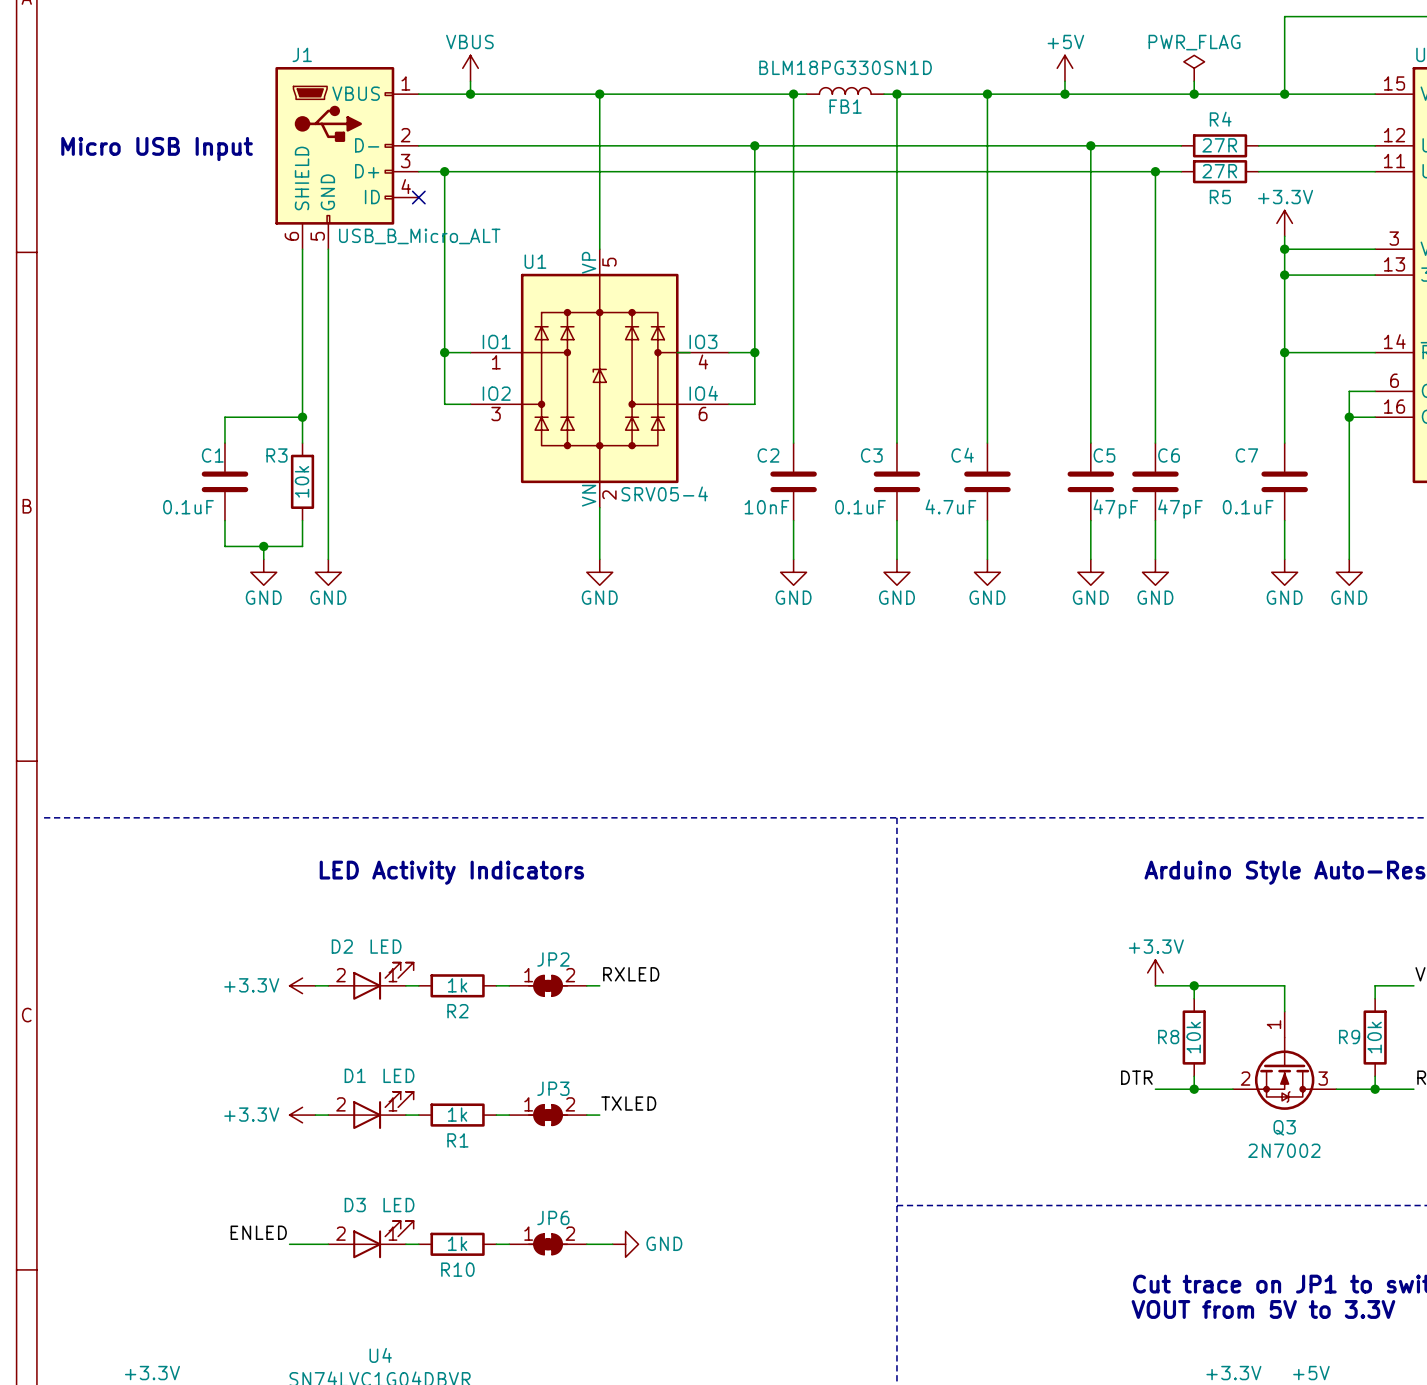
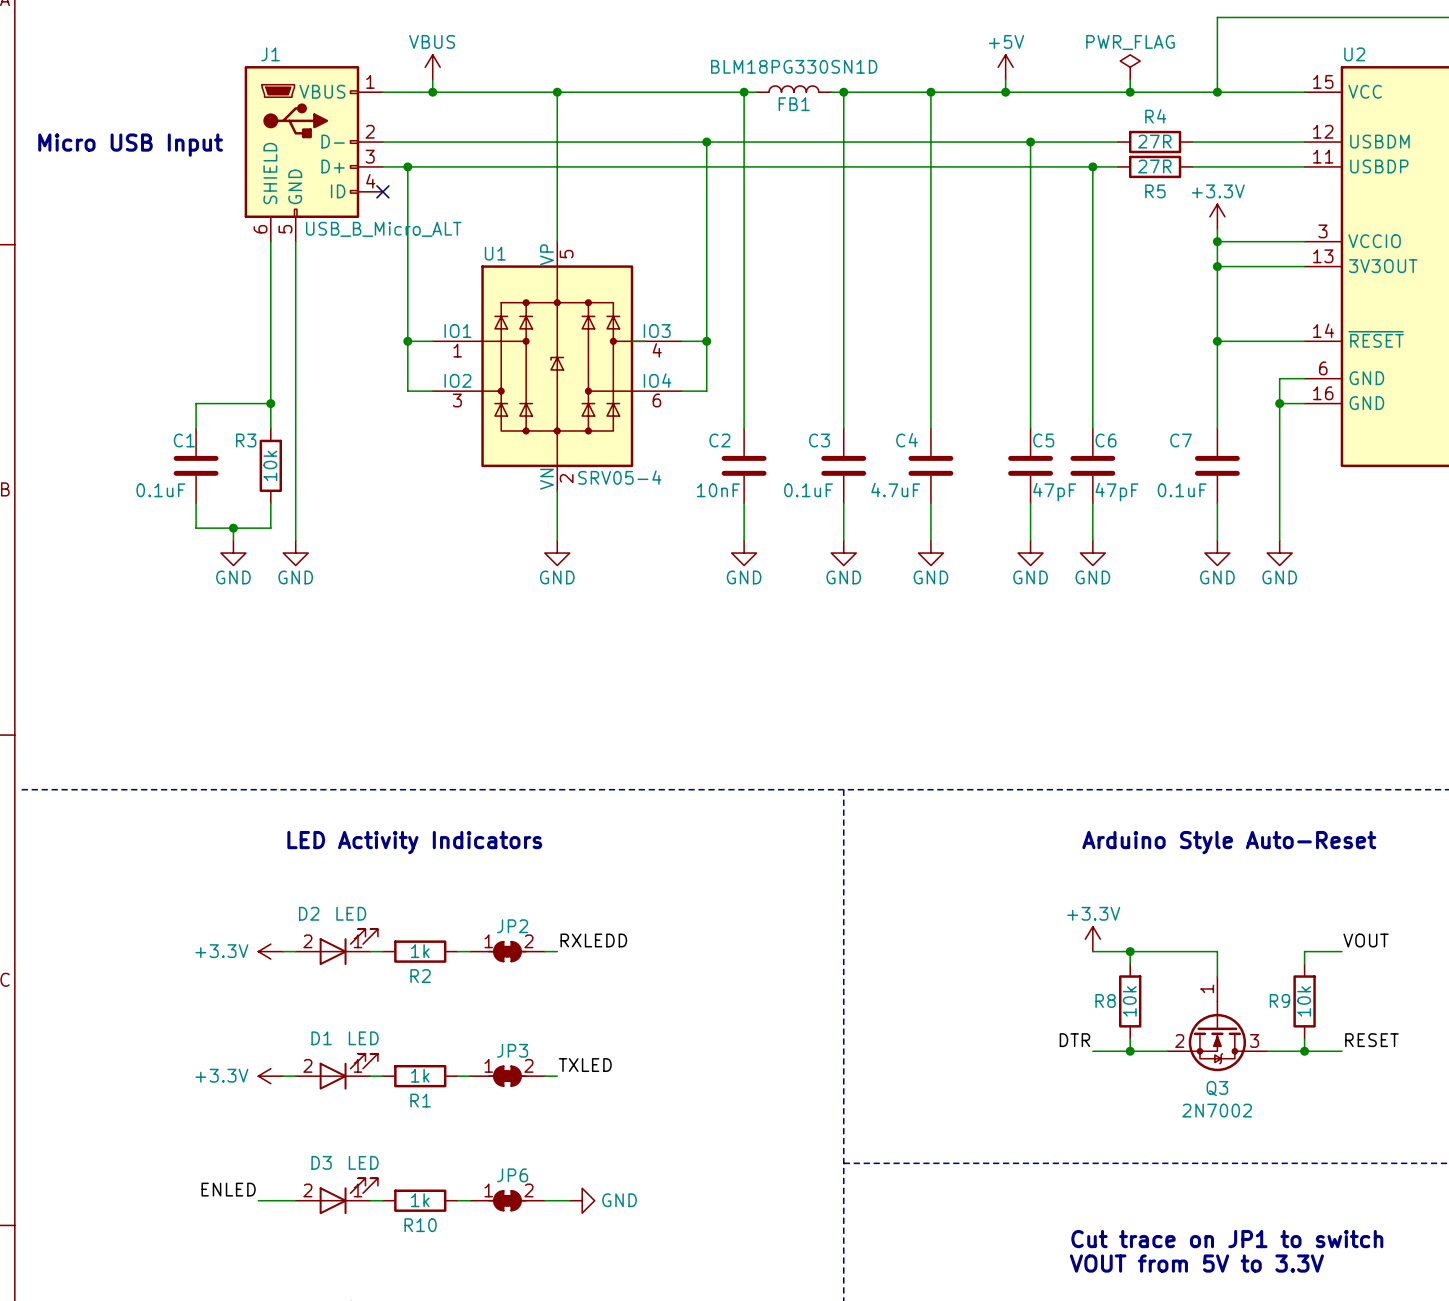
label: RXLED (631, 974) -> RXLEDD (593, 940)

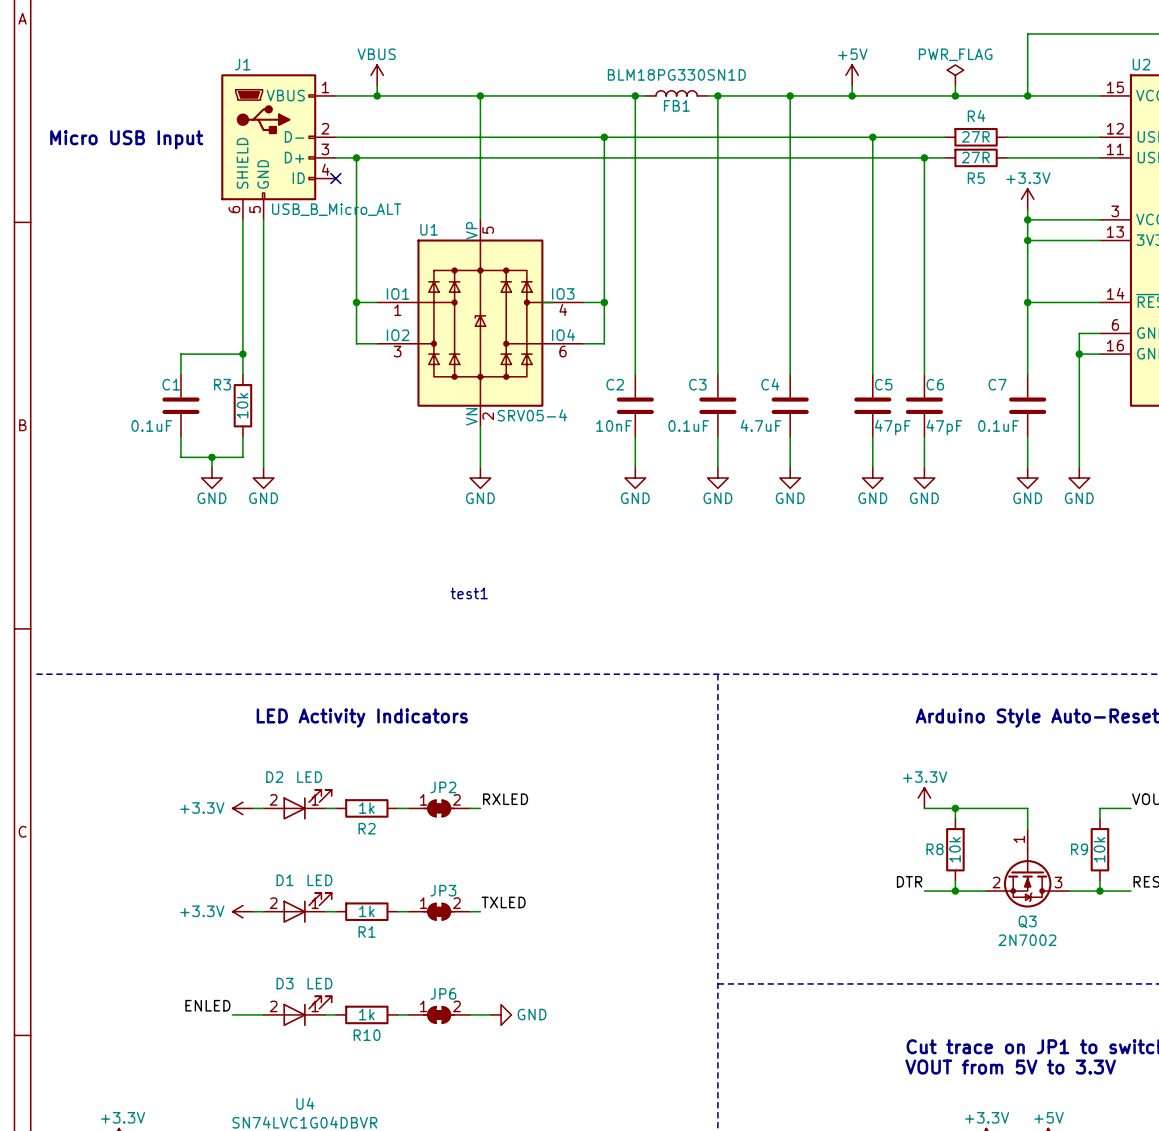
text: none -> test1 (469, 593)
label: RXLEDD (593, 940) -> RXLED (505, 799)

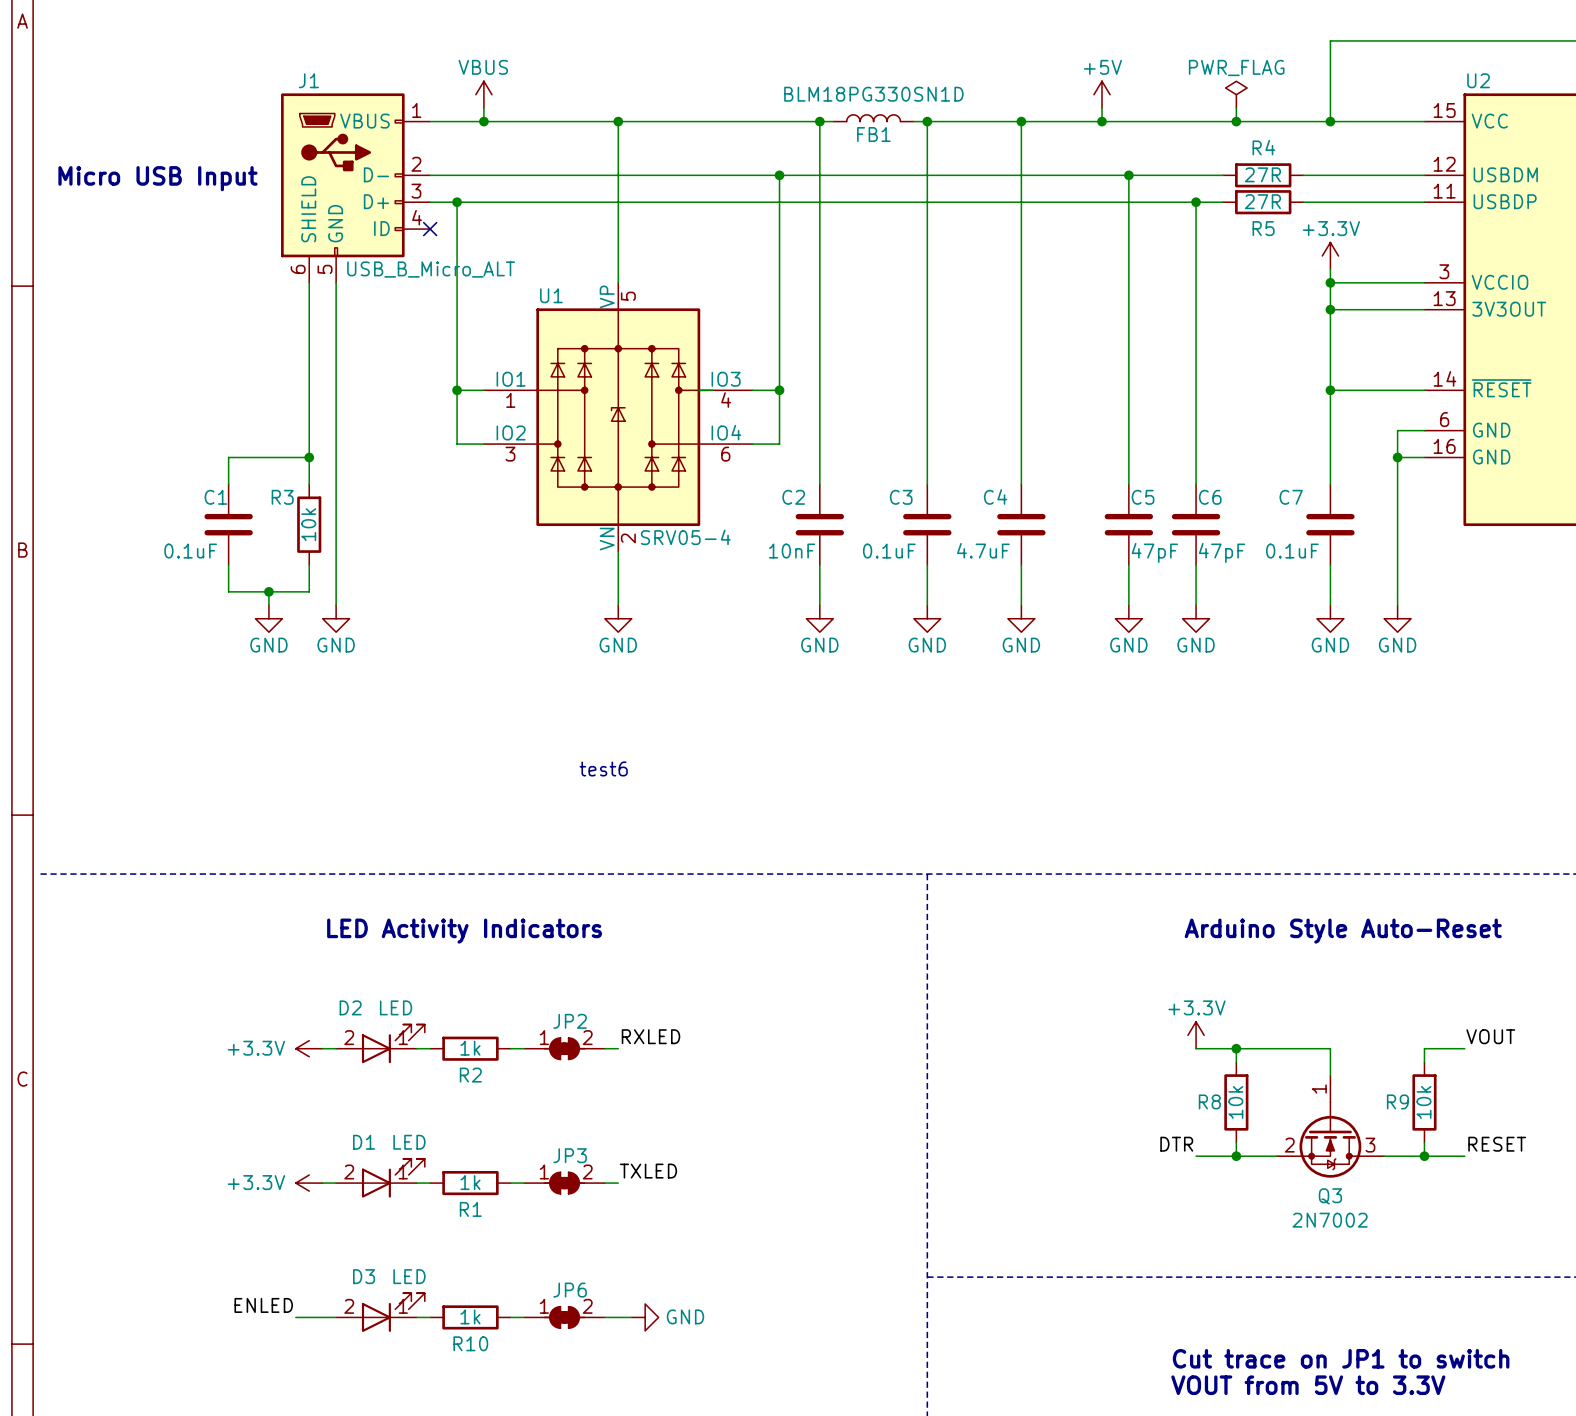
text: test1 (469, 593) -> test6 (603, 768)

